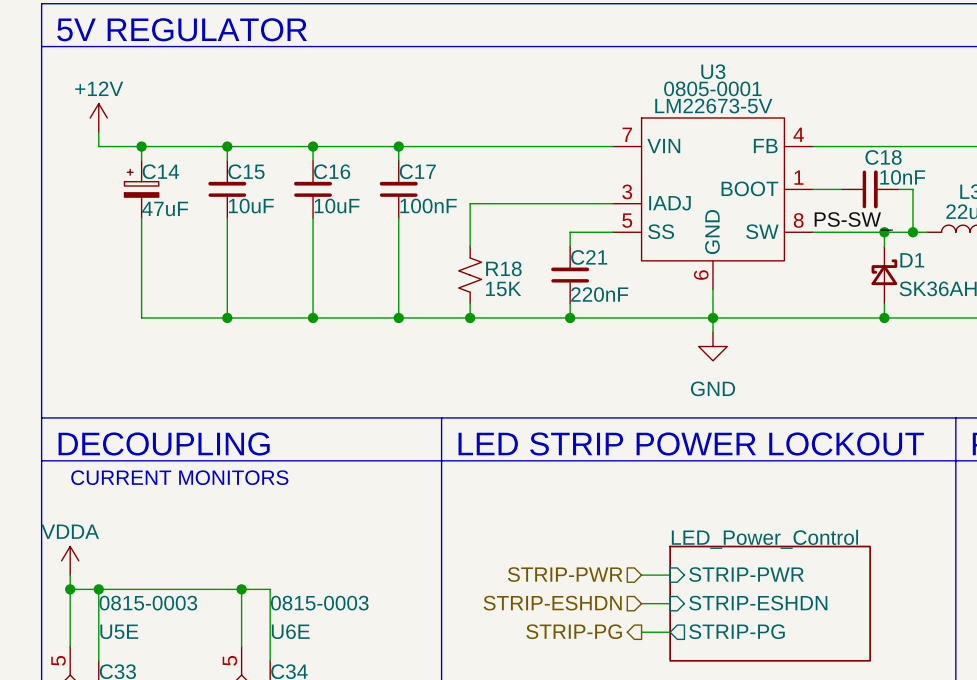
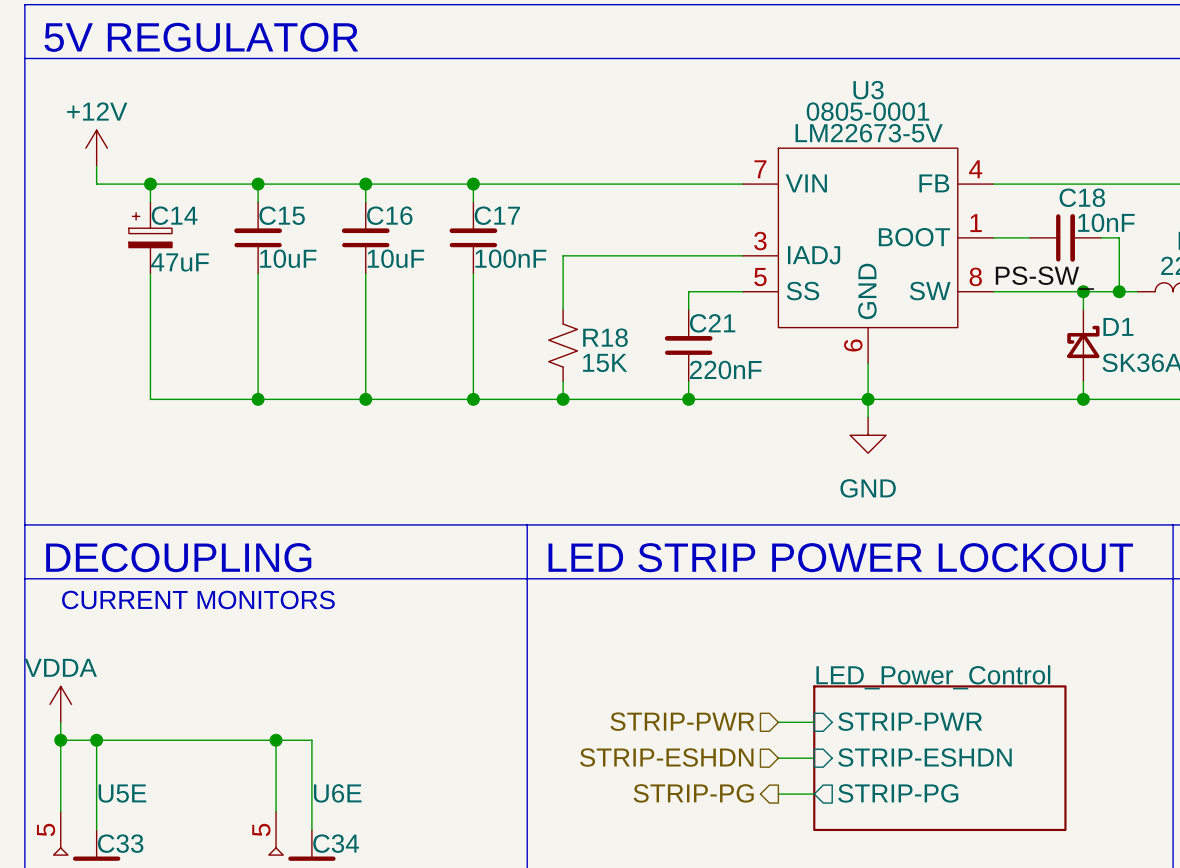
U5E text: 0815-0003 (148, 603) -> none
U6E text: 0815-0003 (319, 603) -> none

